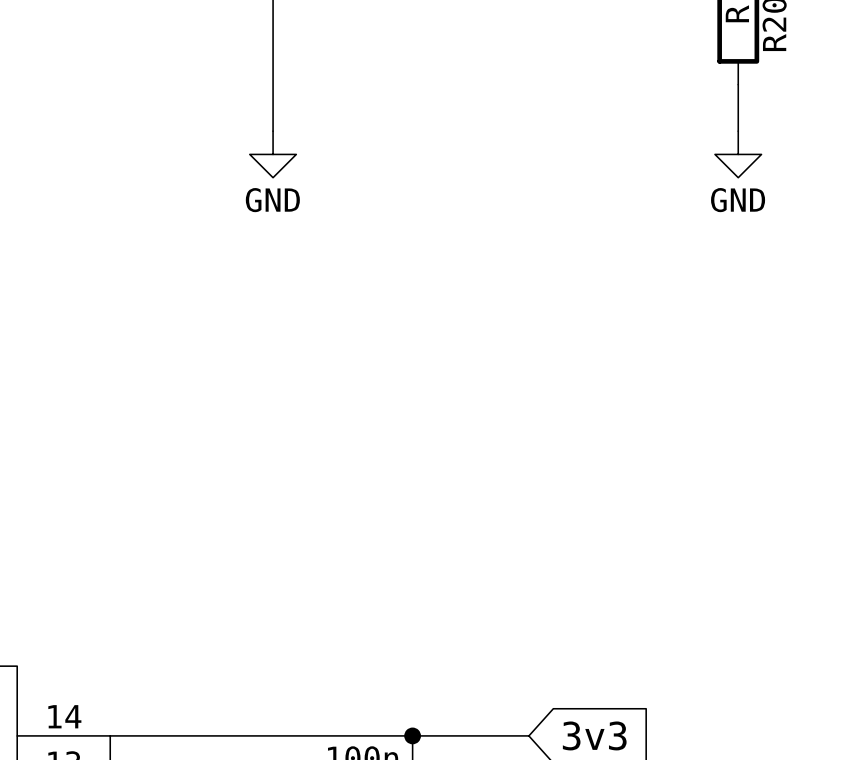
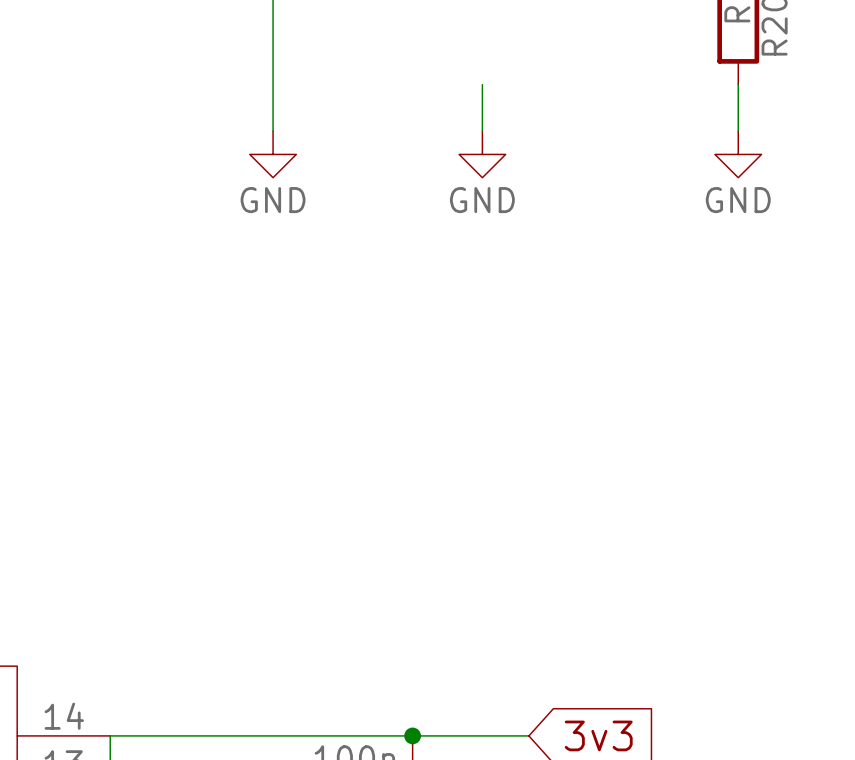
wire: none -> (482, 84) (482, 131)
power symbol: none -> GND (482, 154)

